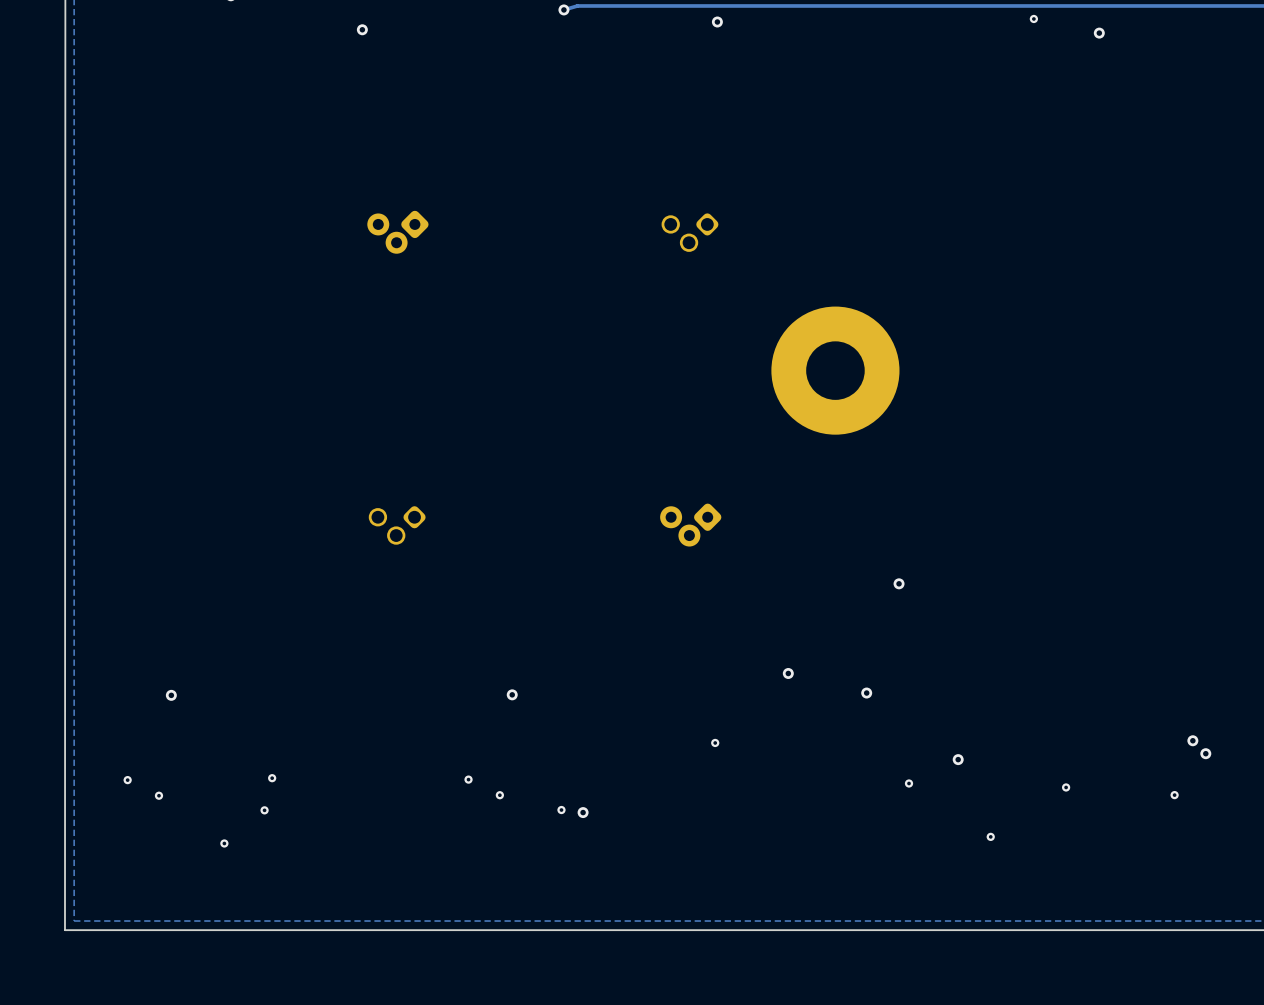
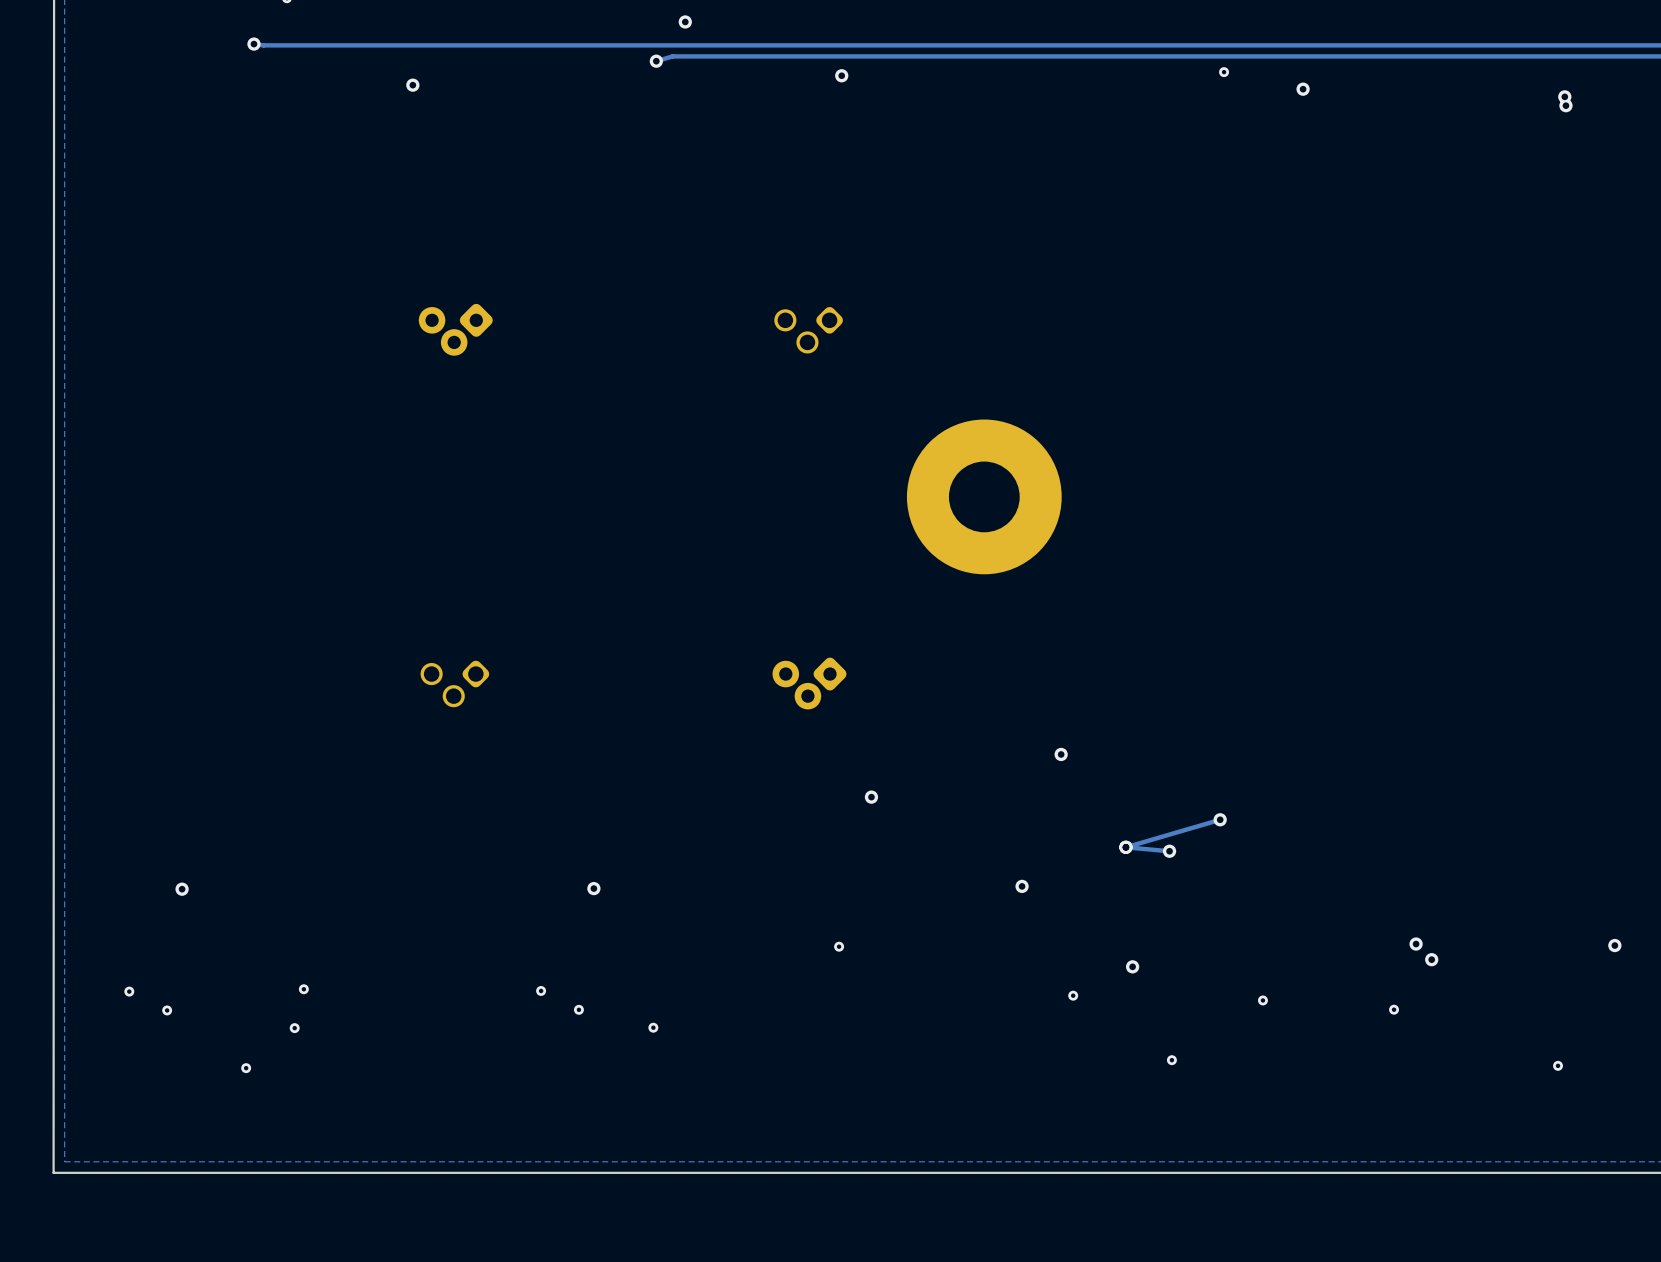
track: none -> (1220, 819) (1125, 847) (1169, 851)
via: none -> (1220, 819)
via: none -> (1125, 847)
via: none -> (1169, 851)
via position: (788, 673) -> (871, 797)
via: (583, 812) -> none

